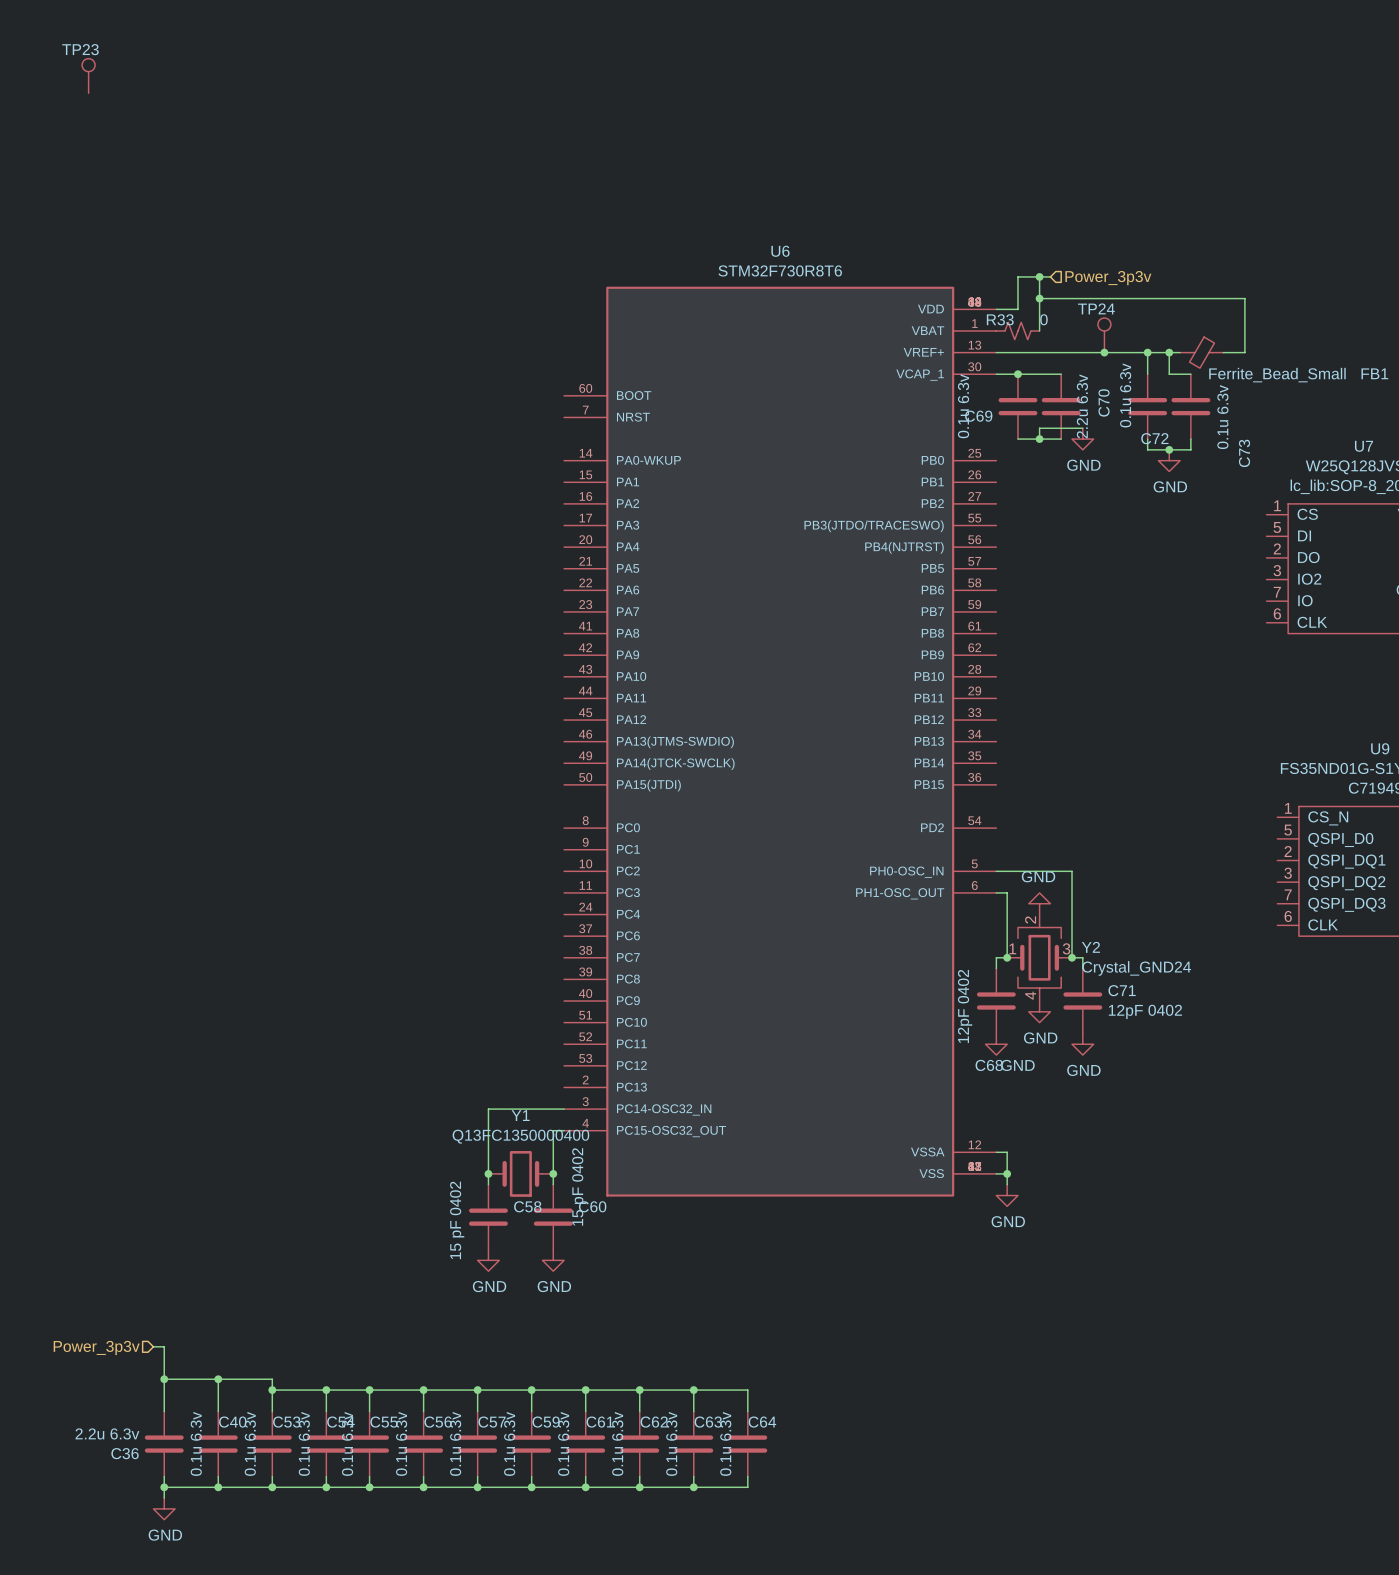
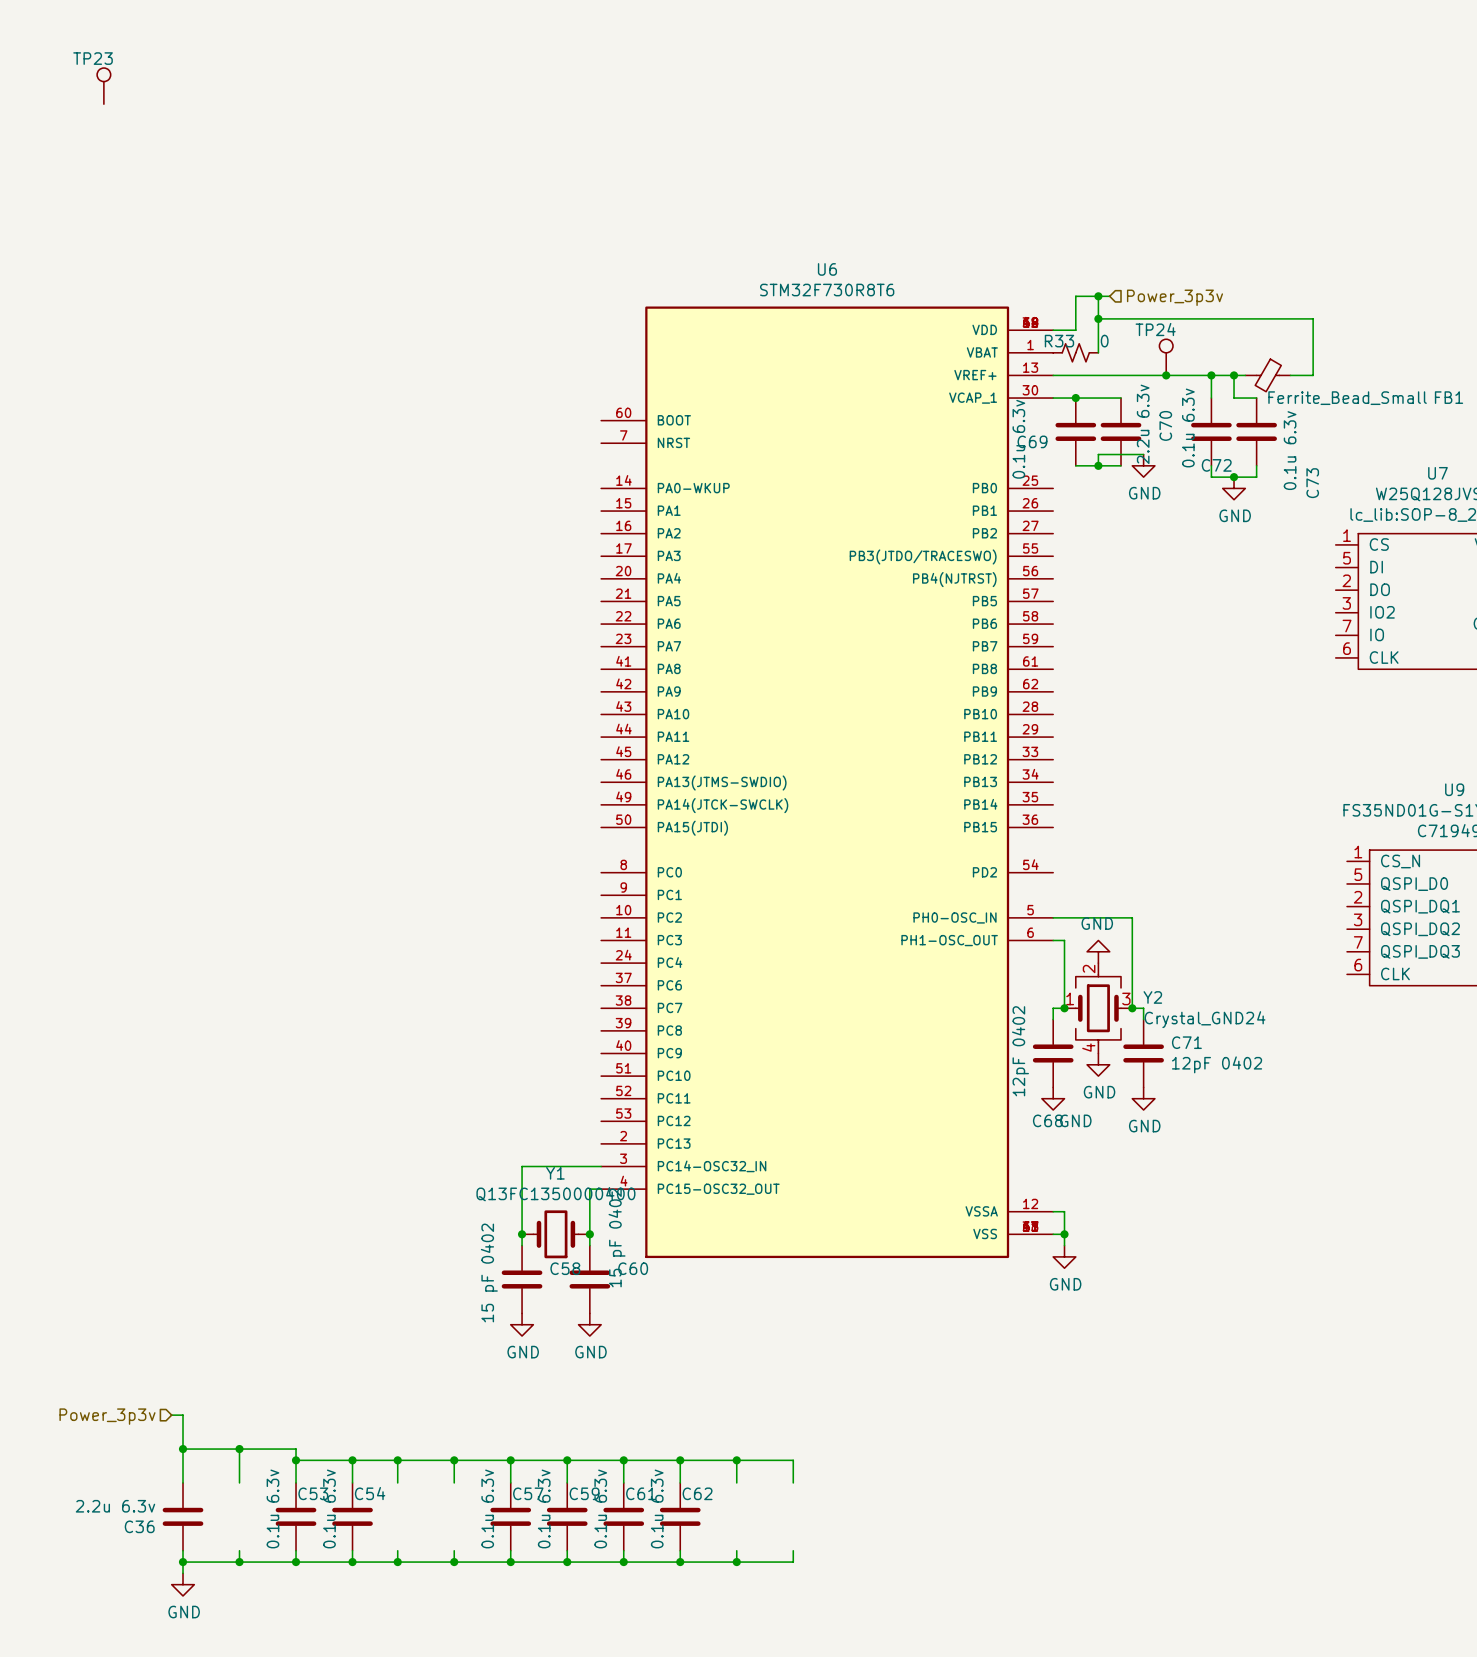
C40: 0.1u 6.3v (218, 1444) -> none
C55: 0.1u 6.3v (369, 1444) -> none
C56: 0.1u 6.3v (423, 1444) -> none
C63: 0.1u 6.3v (693, 1444) -> none
C64: 0.1u 6.3v (747, 1444) -> none

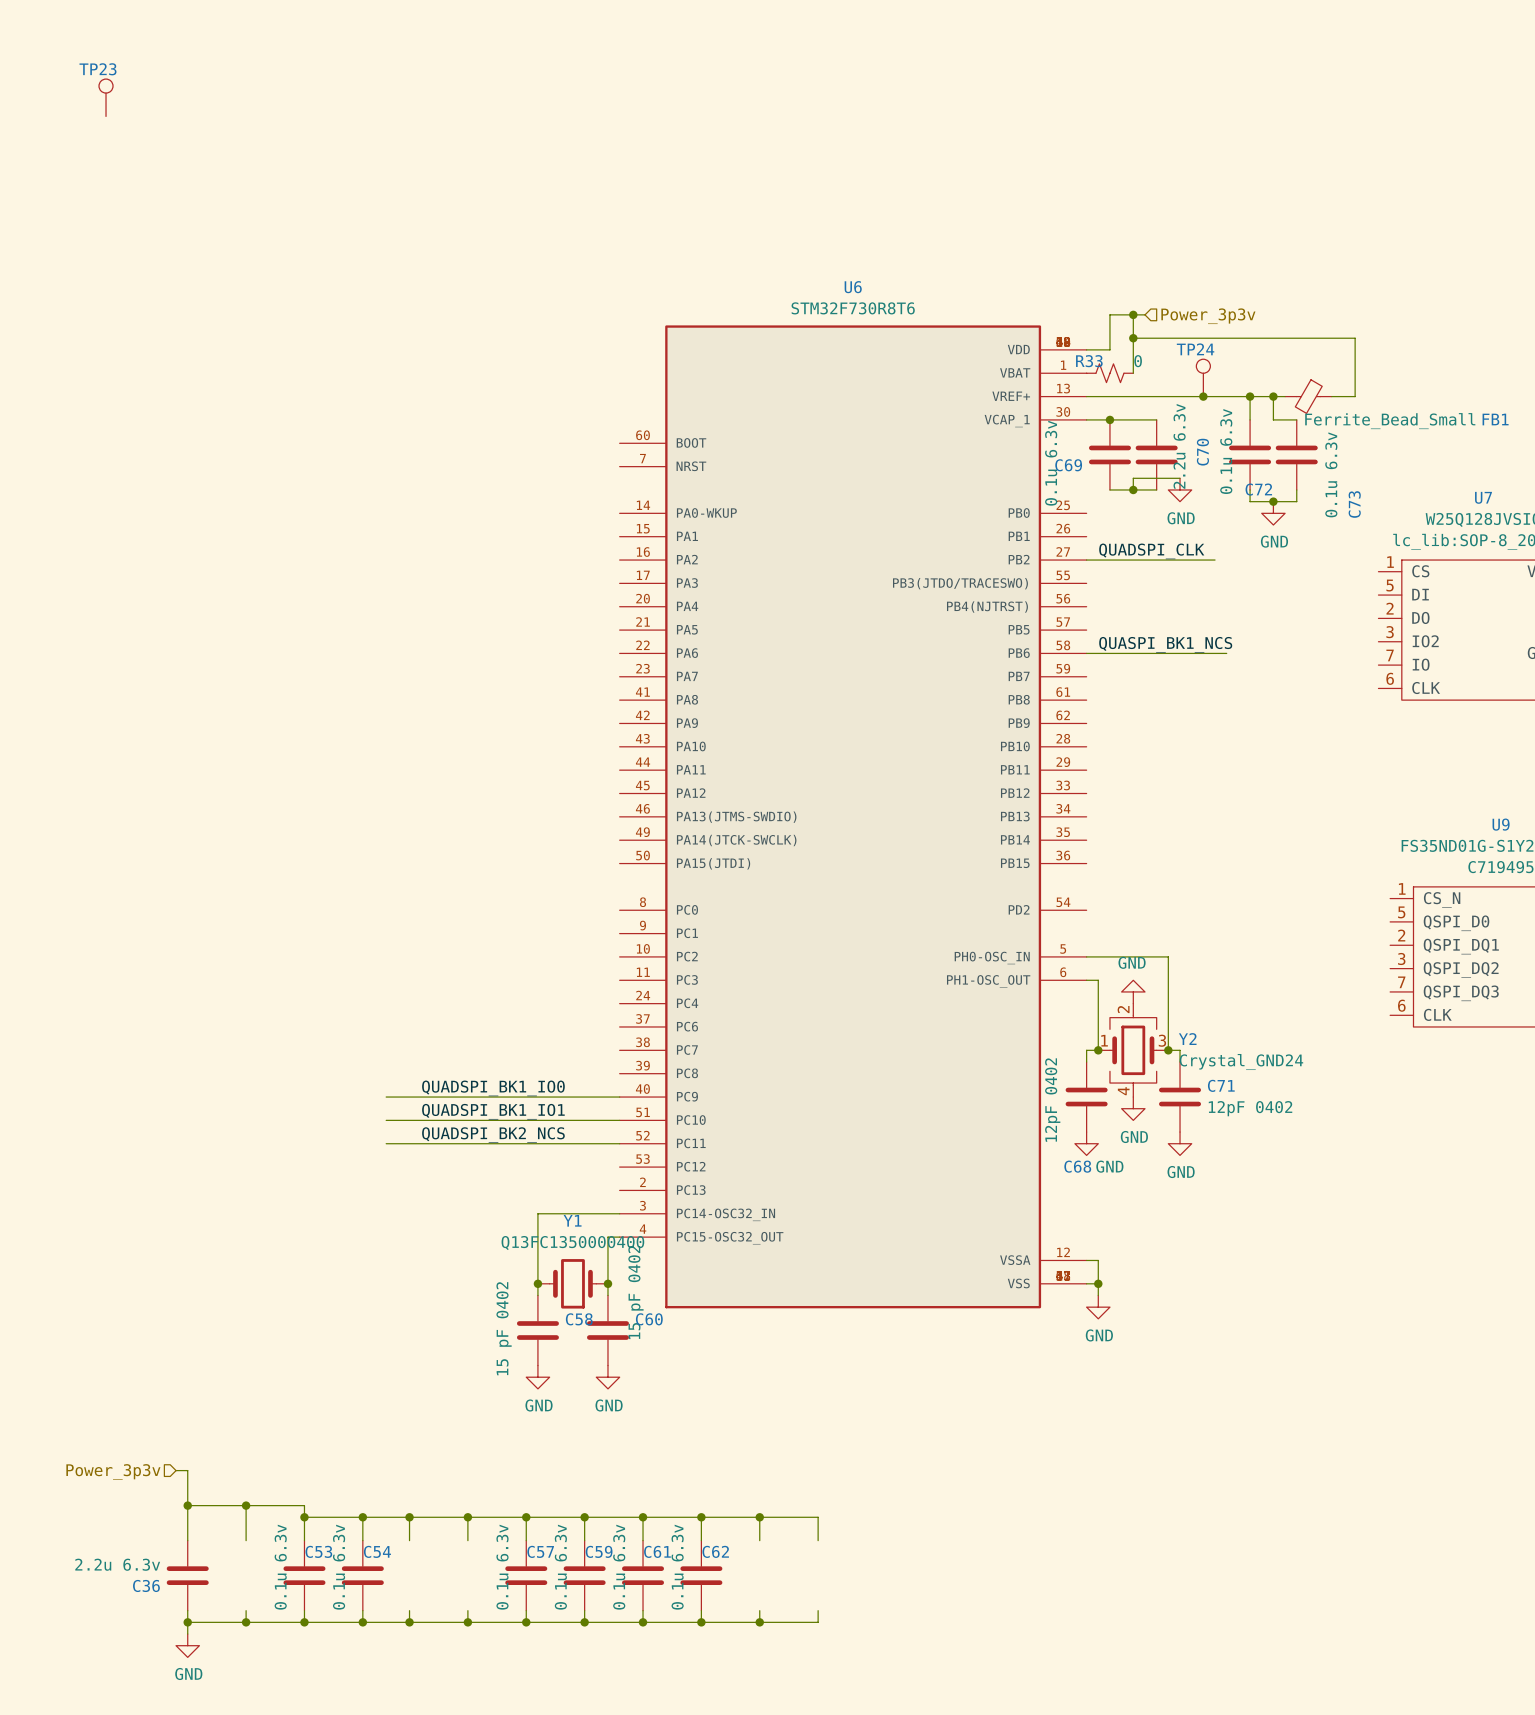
label: none -> QUADSPI_CLK (1151, 551)
wire: none -> (1086, 560) (1215, 560)
label: none -> QUASPI_BK1_NCS (1165, 644)
wire: none -> (1086, 653) (1226, 653)
label: none -> QUADSPI_BK1_IO0 (493, 1088)
wire: none -> (386, 1097) (619, 1097)
label: none -> QUADSPI_BK1_IO1 (493, 1111)
wire: none -> (386, 1120) (619, 1120)
label: none -> QUADSPI_BK2_NCS (493, 1135)
wire: none -> (386, 1143) (619, 1143)

